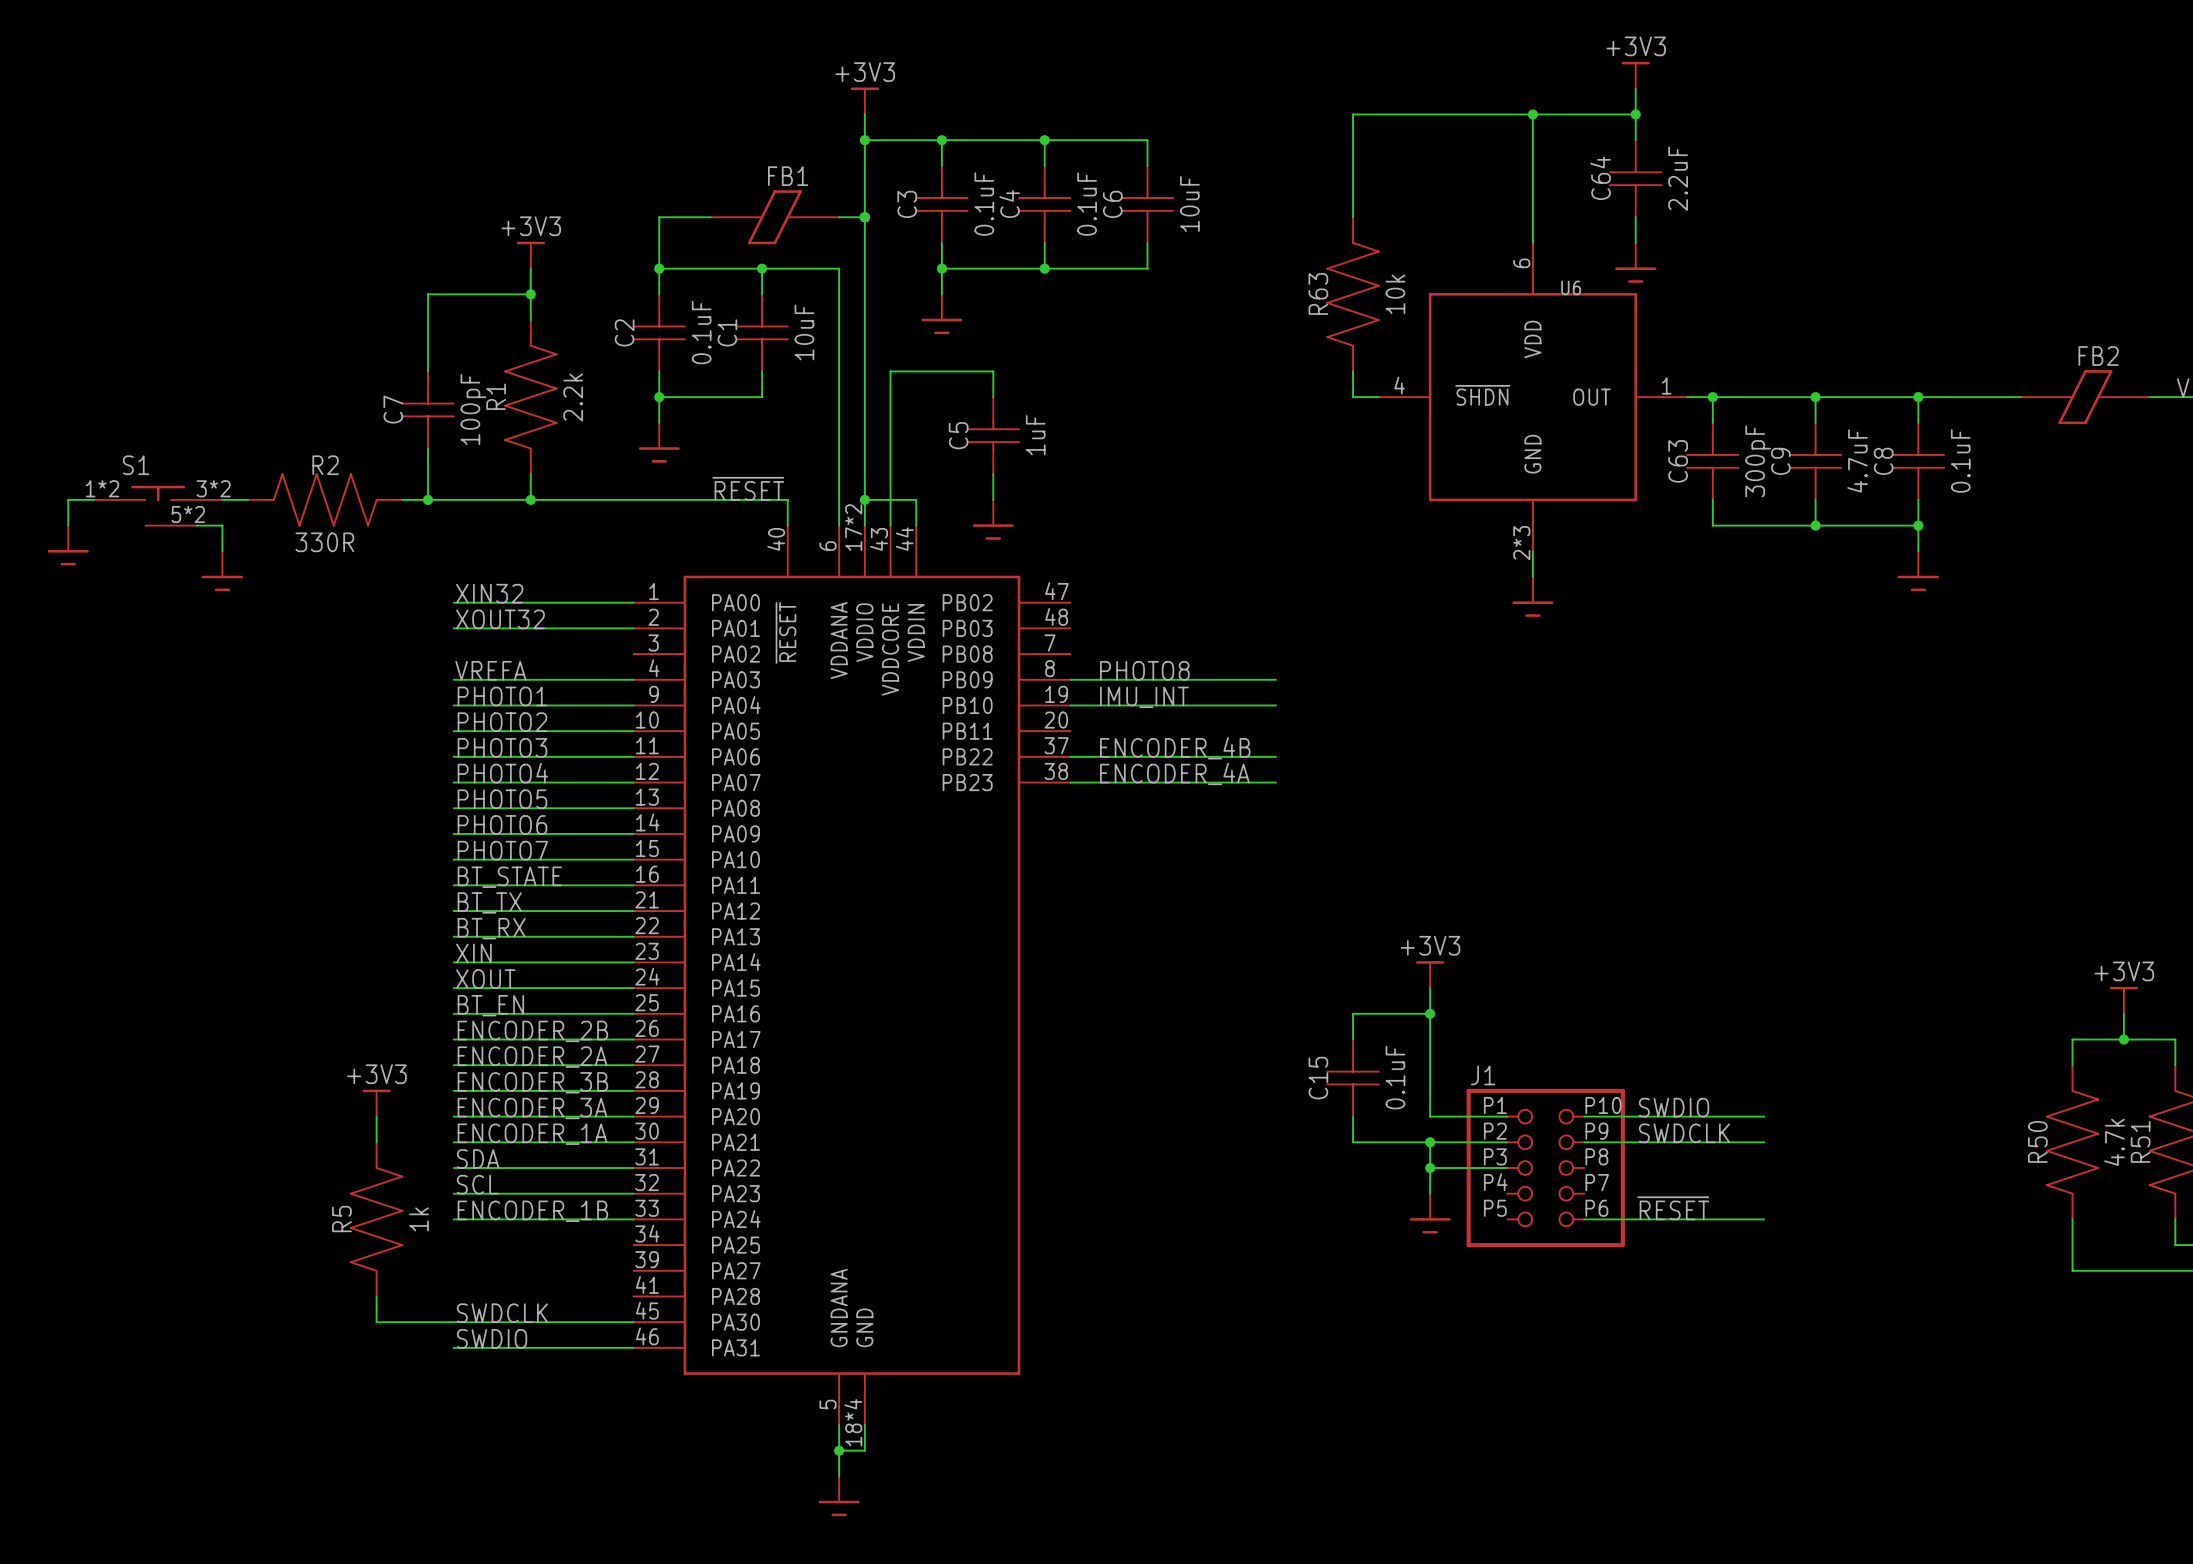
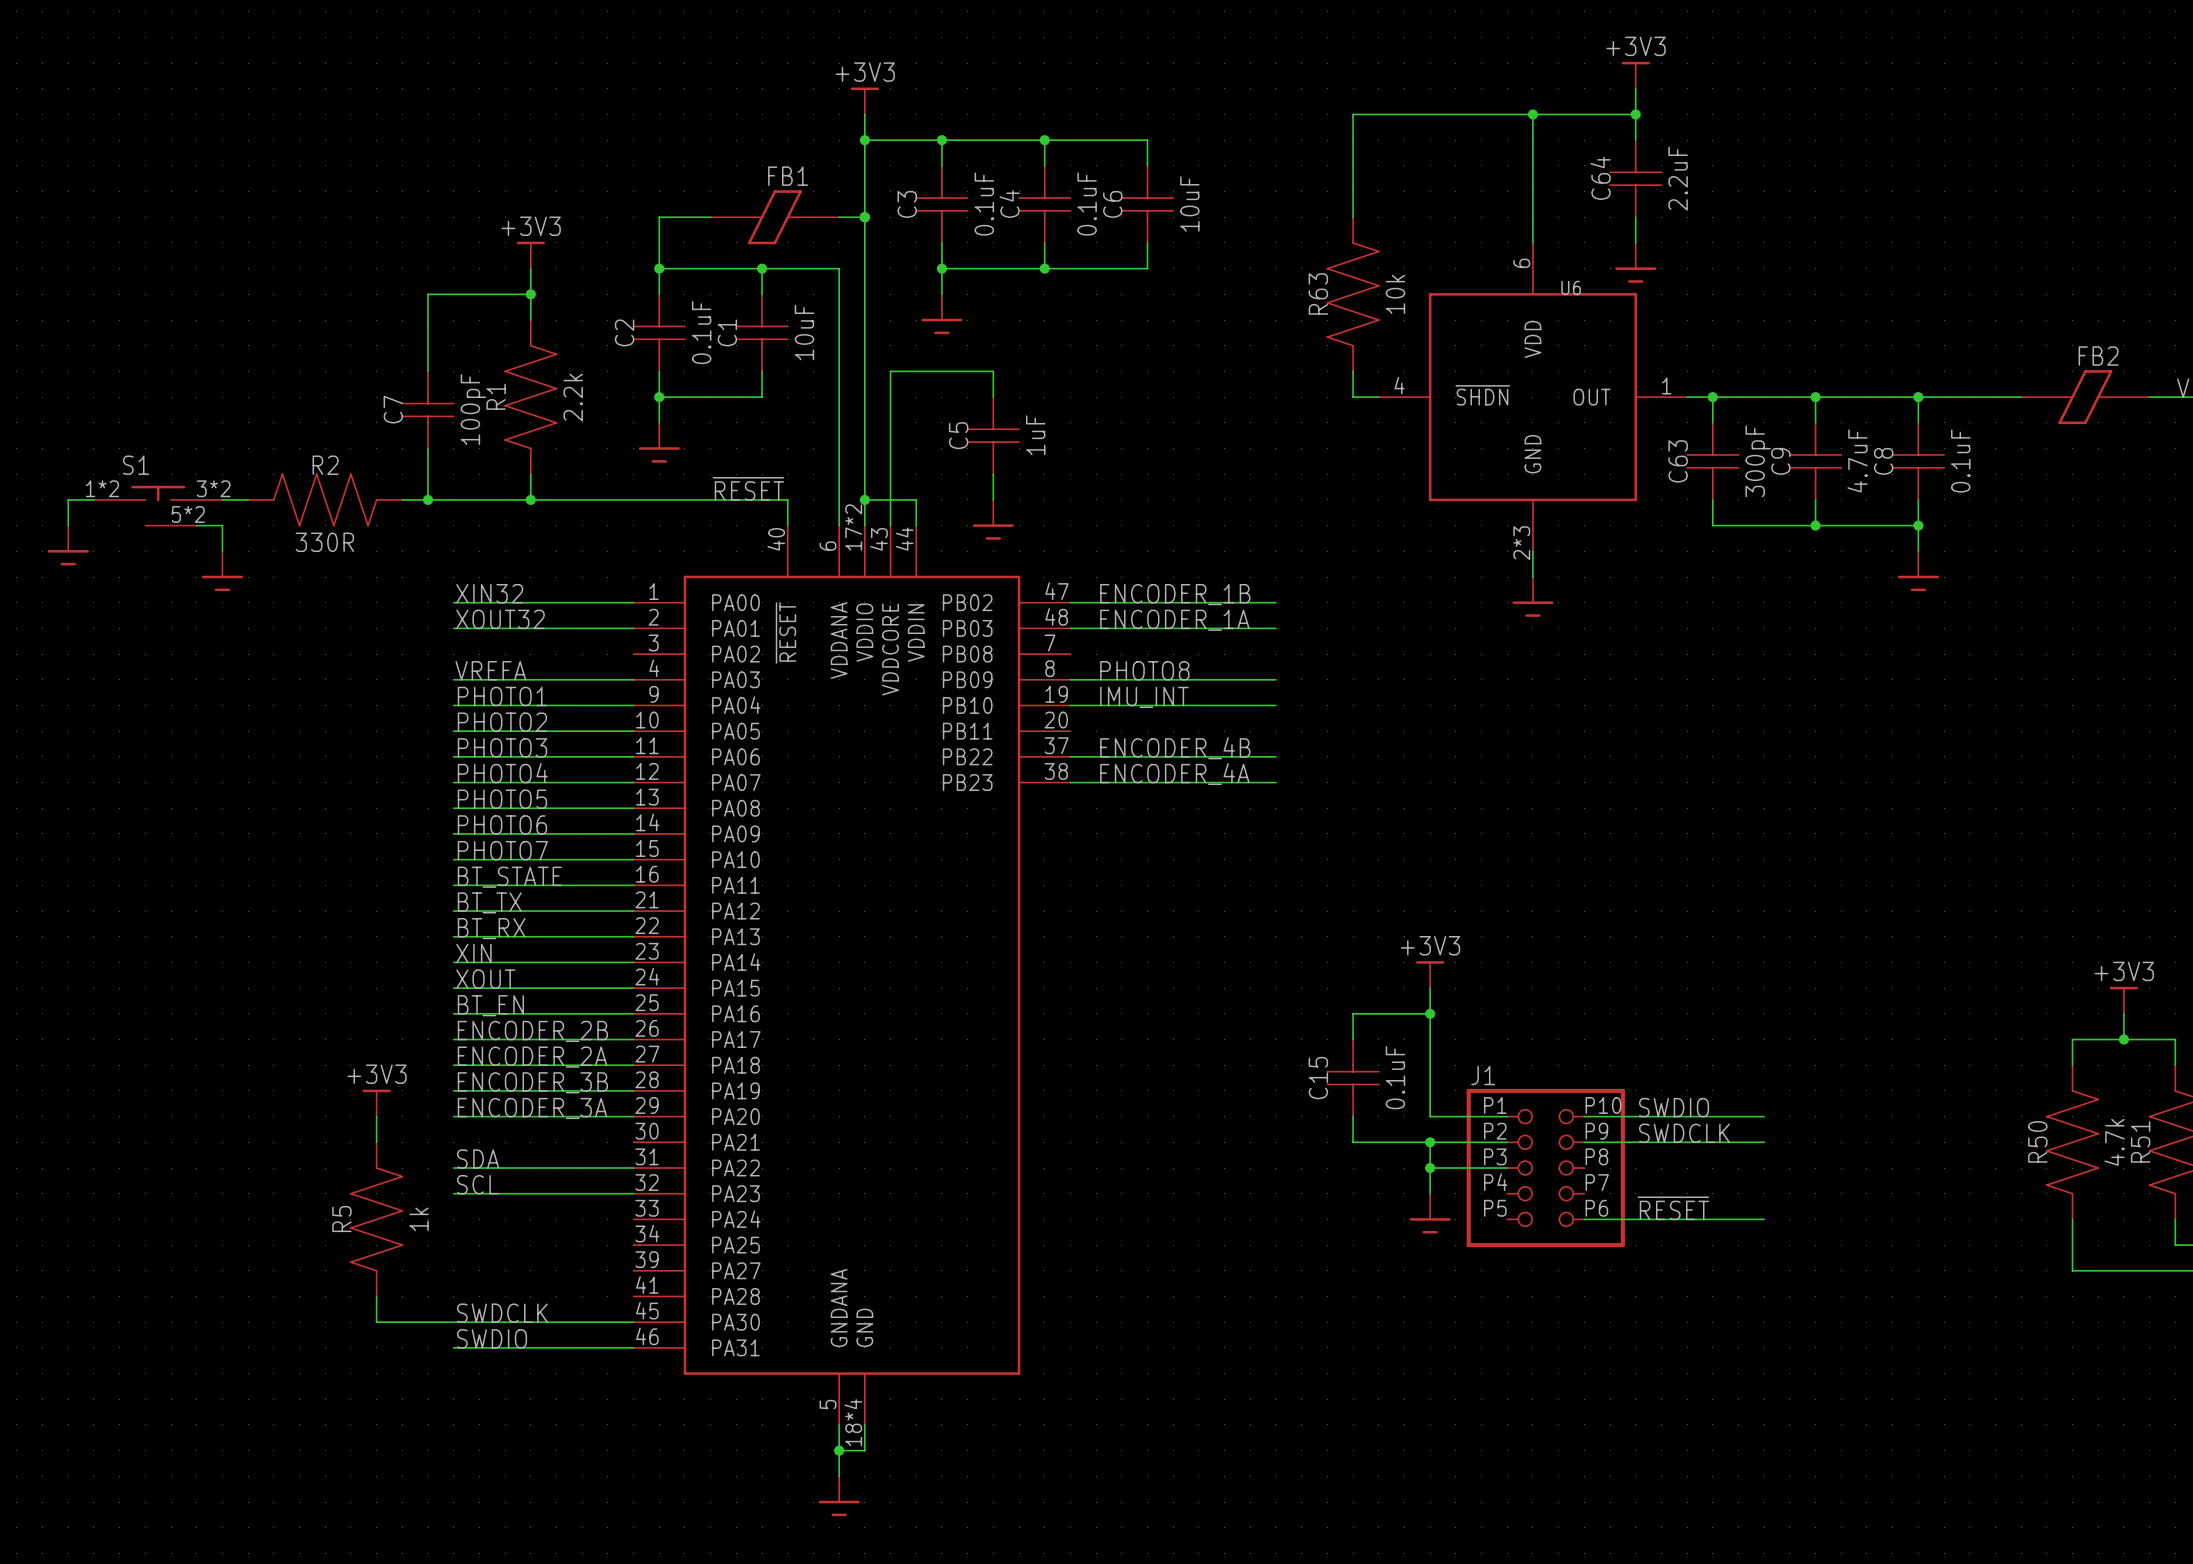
label: none -> ENCODER_1B (1175, 594)
wire: none -> (1070, 602) (1275, 602)
label: none -> ENCODER_1A (1174, 620)
wire: none -> (1070, 628) (1275, 628)
label: ENCODER_1A (532, 1134) -> none
wire: (453, 1142) (633, 1142) -> none
label: ENCODER_1B (532, 1211) -> none
wire: (453, 1219) (633, 1219) -> none

